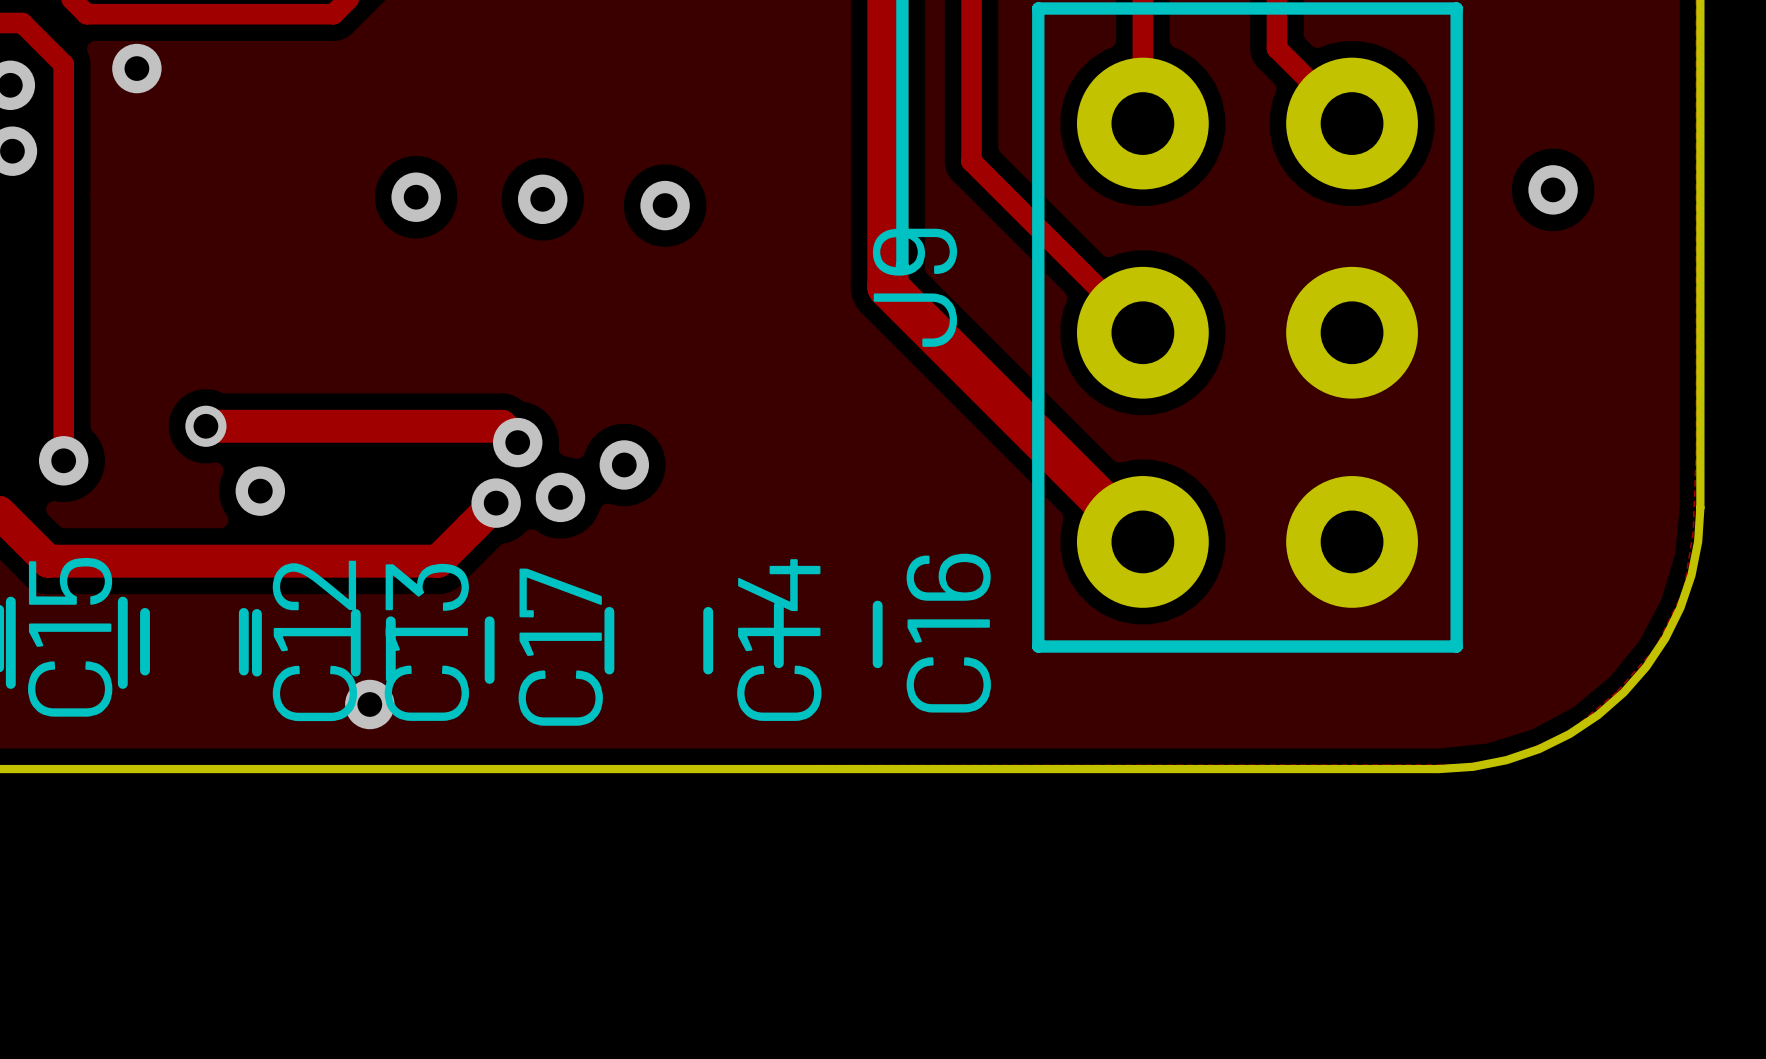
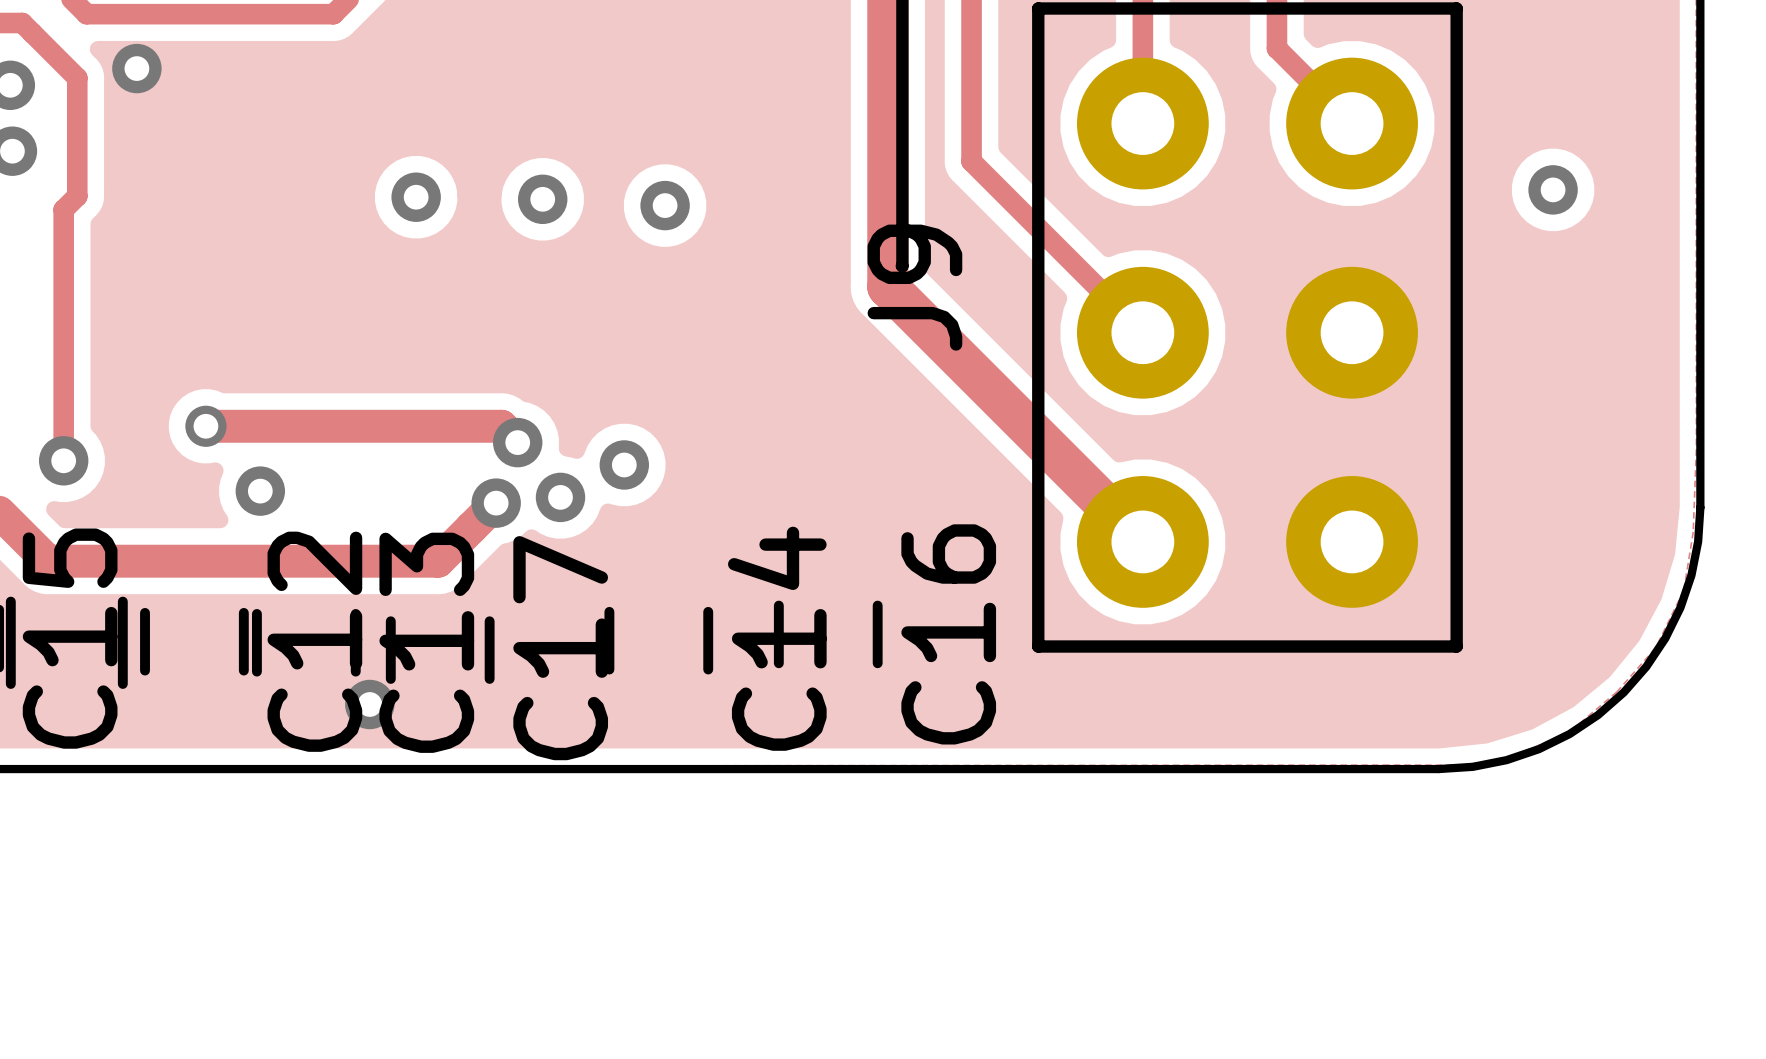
track: (63, 64) (63, 209) -> (63, 64) (77, 77) (77, 196) (63, 209)

